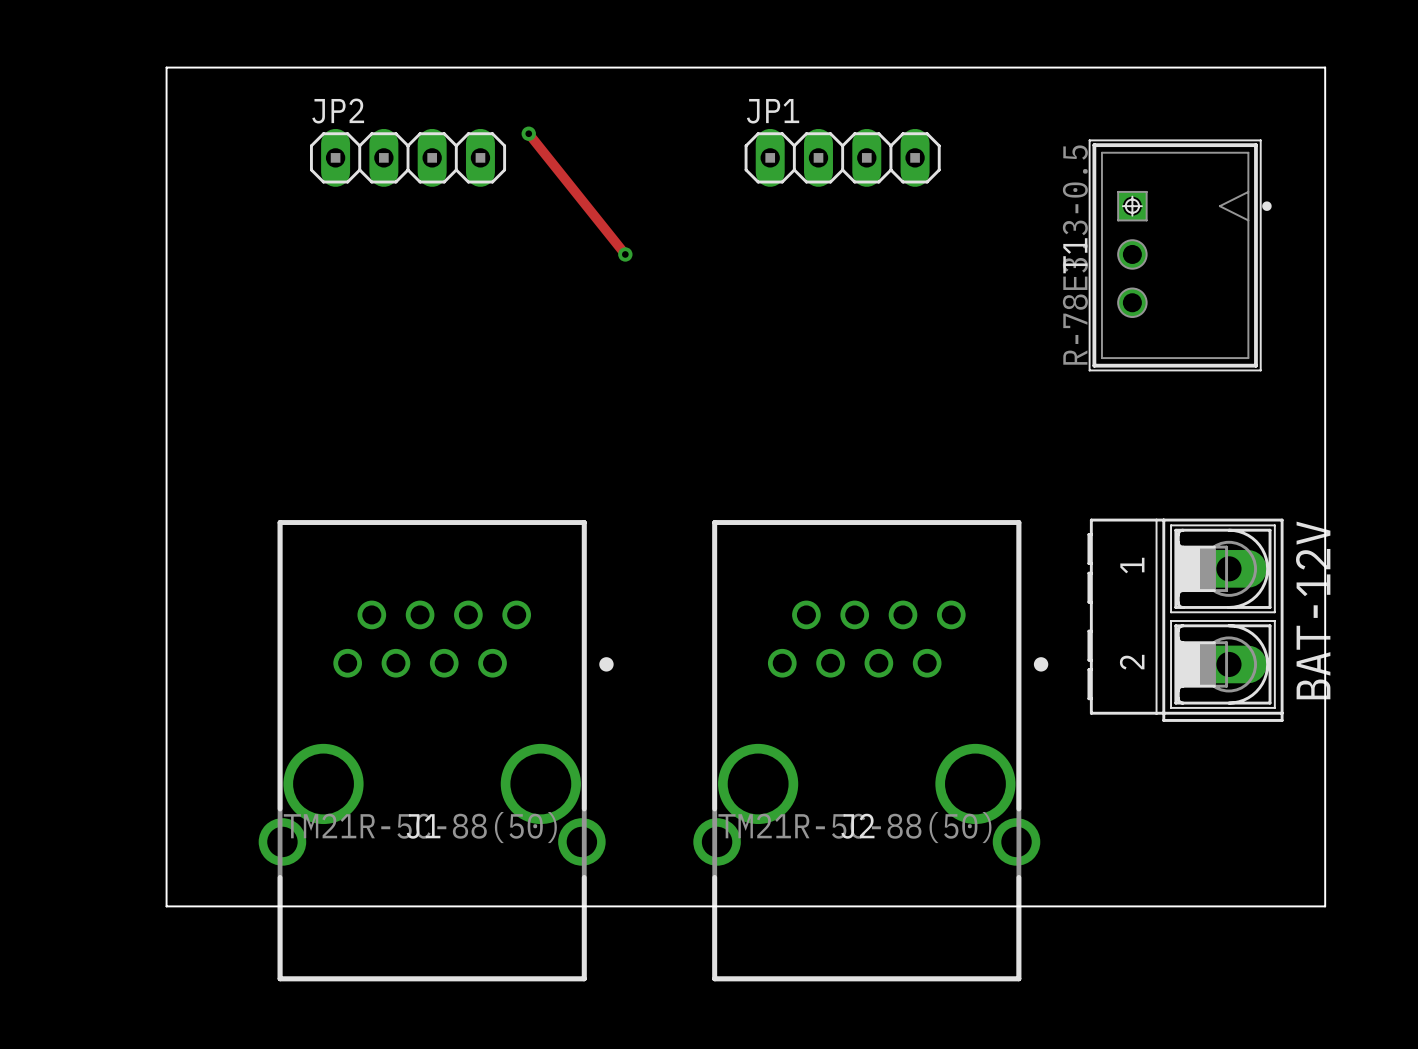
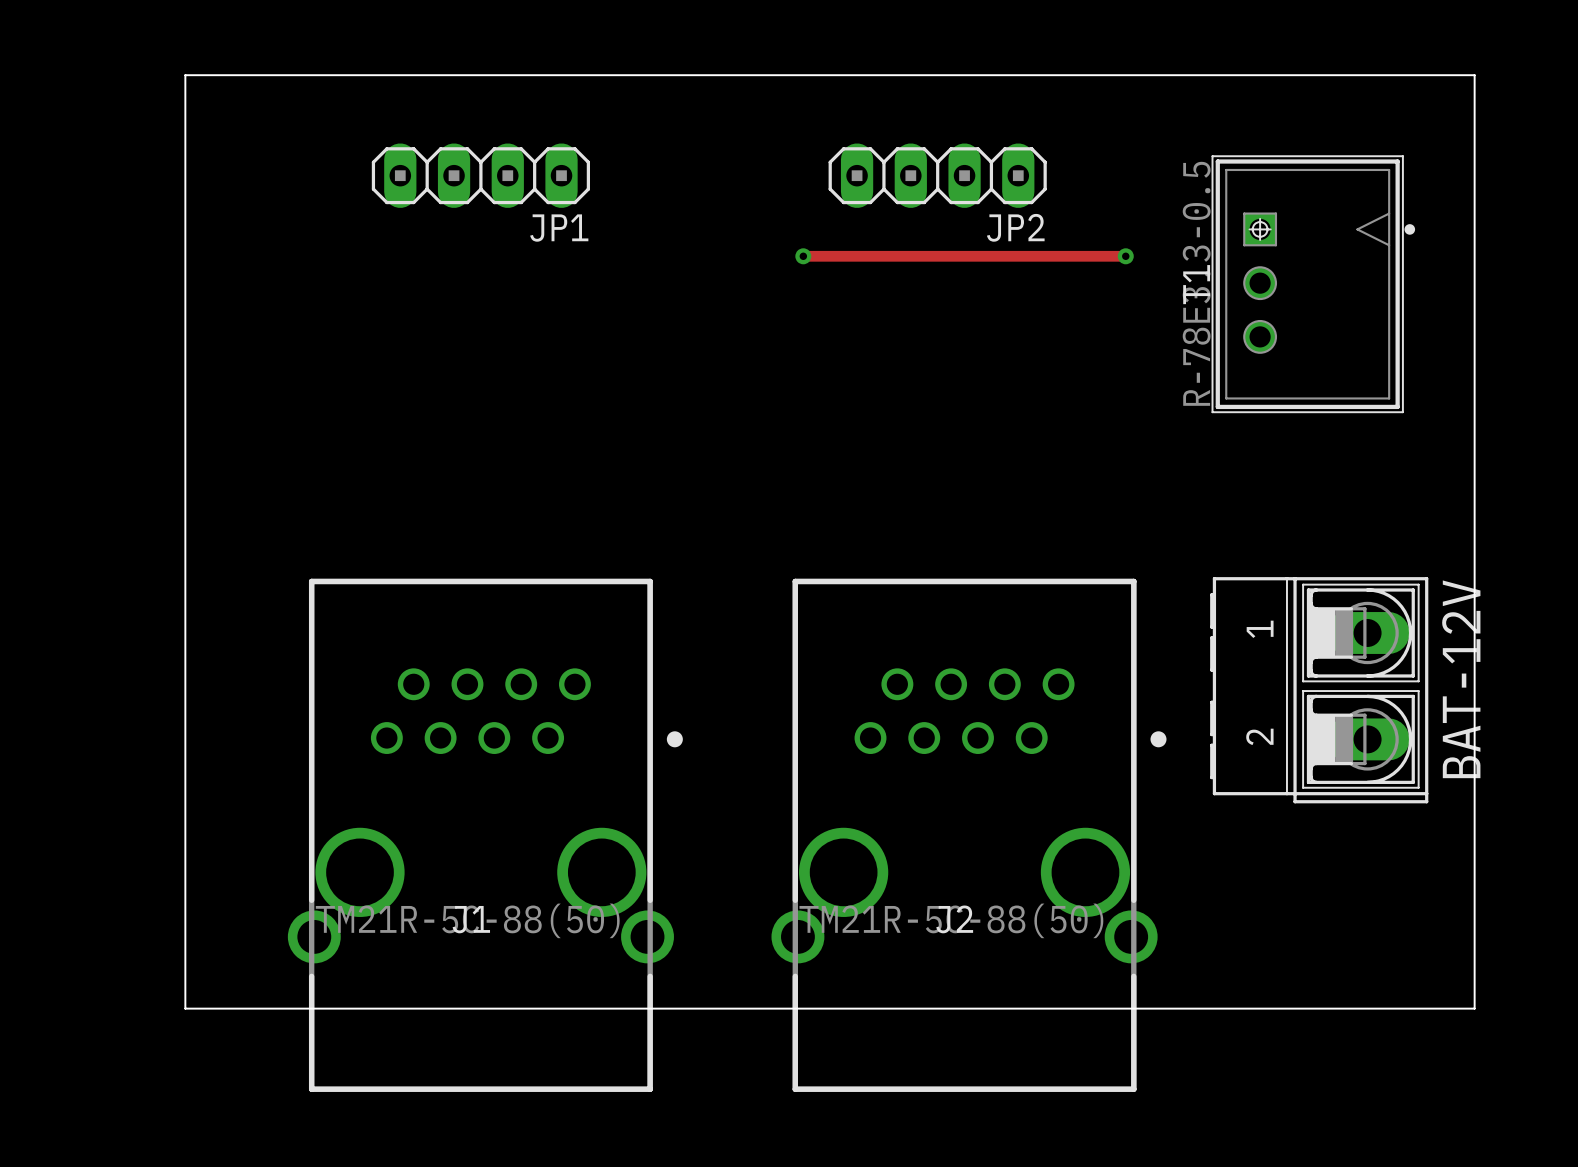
JP1 name: JP1 (773, 111) -> JP2 (1015, 227)
track: (528, 133) (625, 254) -> none
via: (528, 133) -> none
JP2: (408, 157) -> none
JP1: none -> (480, 175)
track: none -> (803, 256) (1125, 256)
via: none -> (1125, 256)
via position: (625, 254) -> (803, 256)

